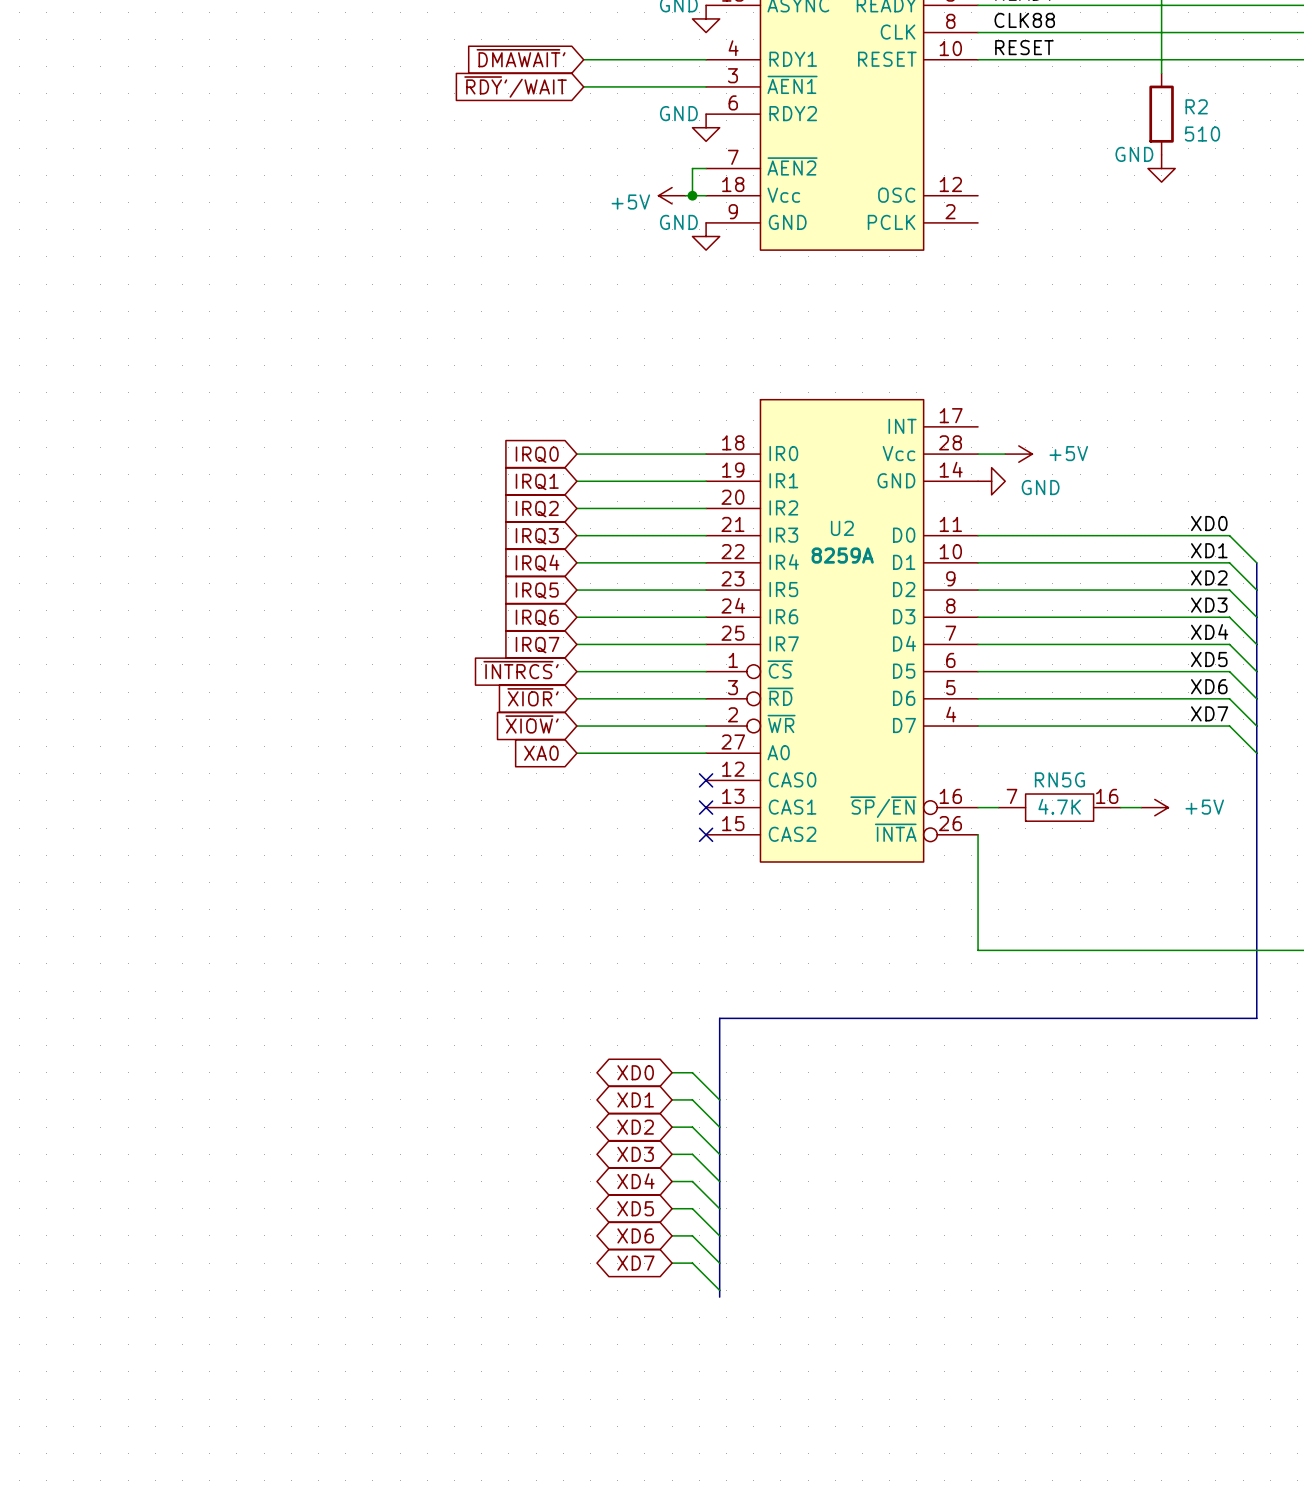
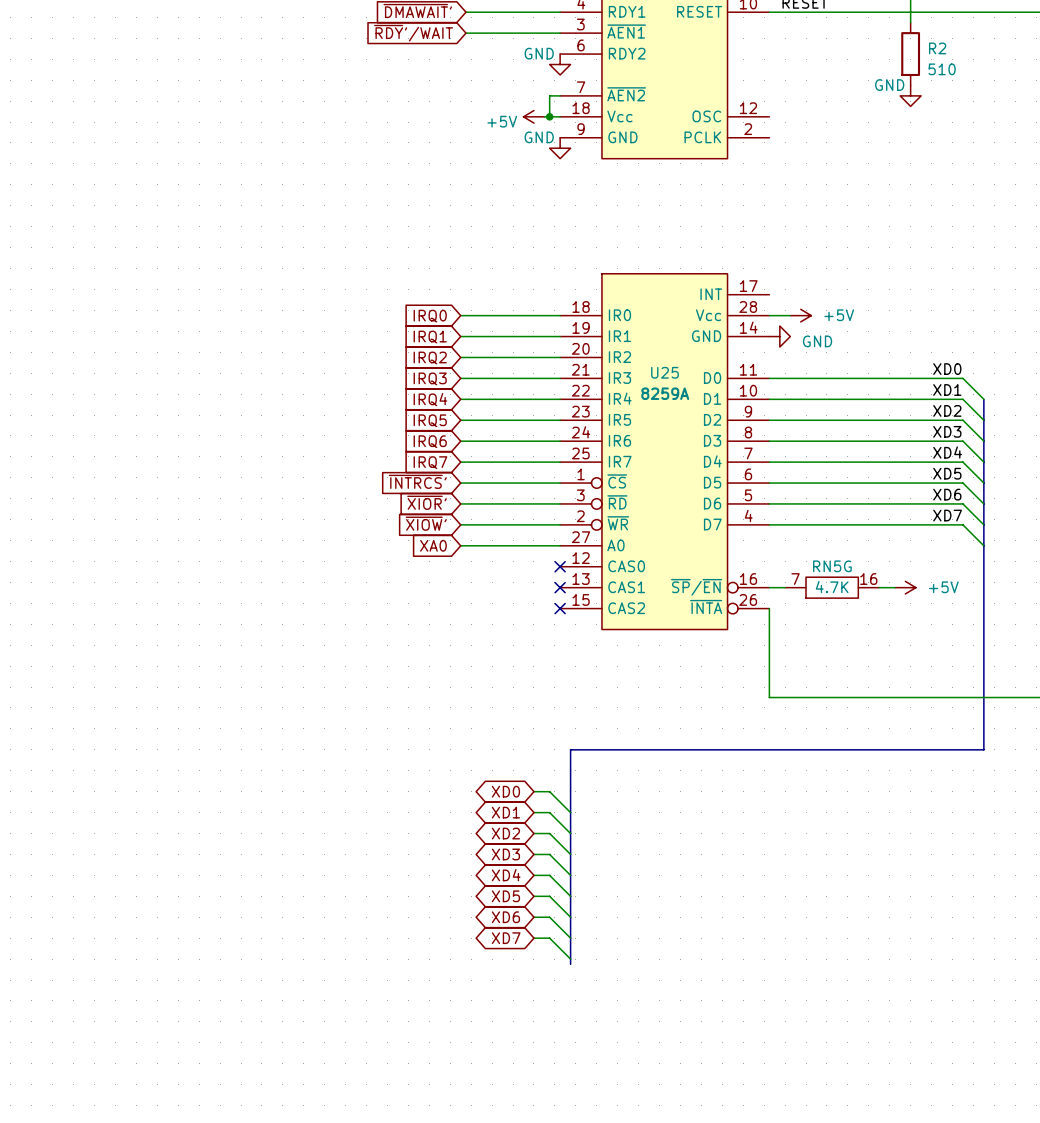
U2 name: U2 (842, 528) -> U25 (665, 372)

